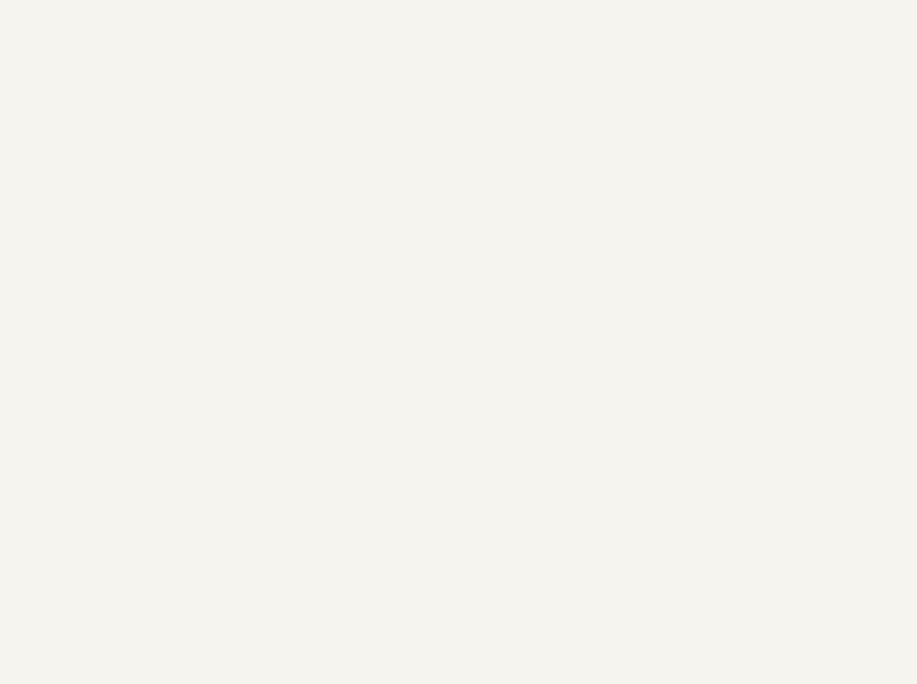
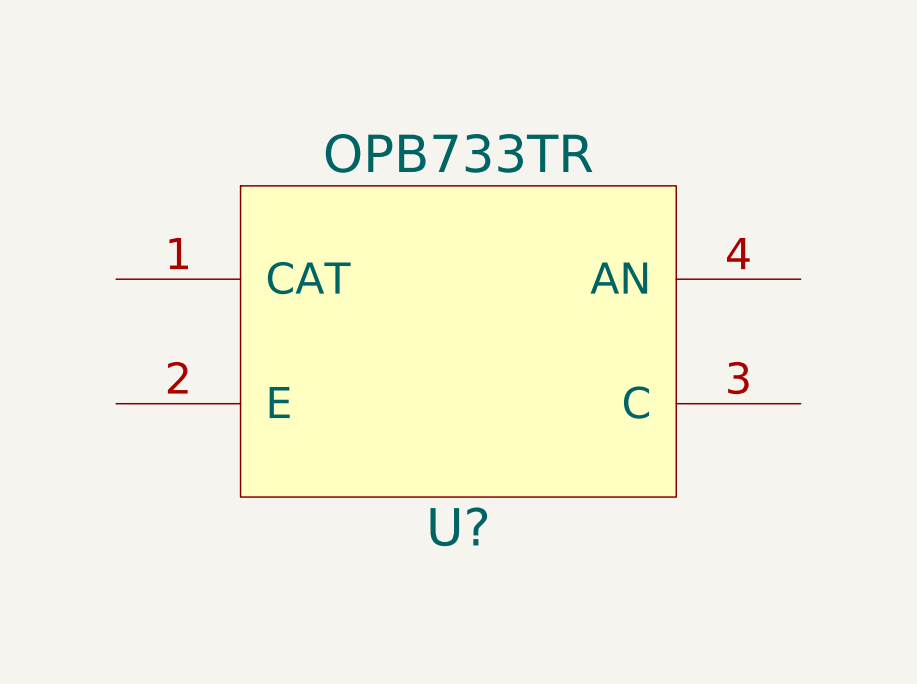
U?: none -> OPB733TR (458, 341)

